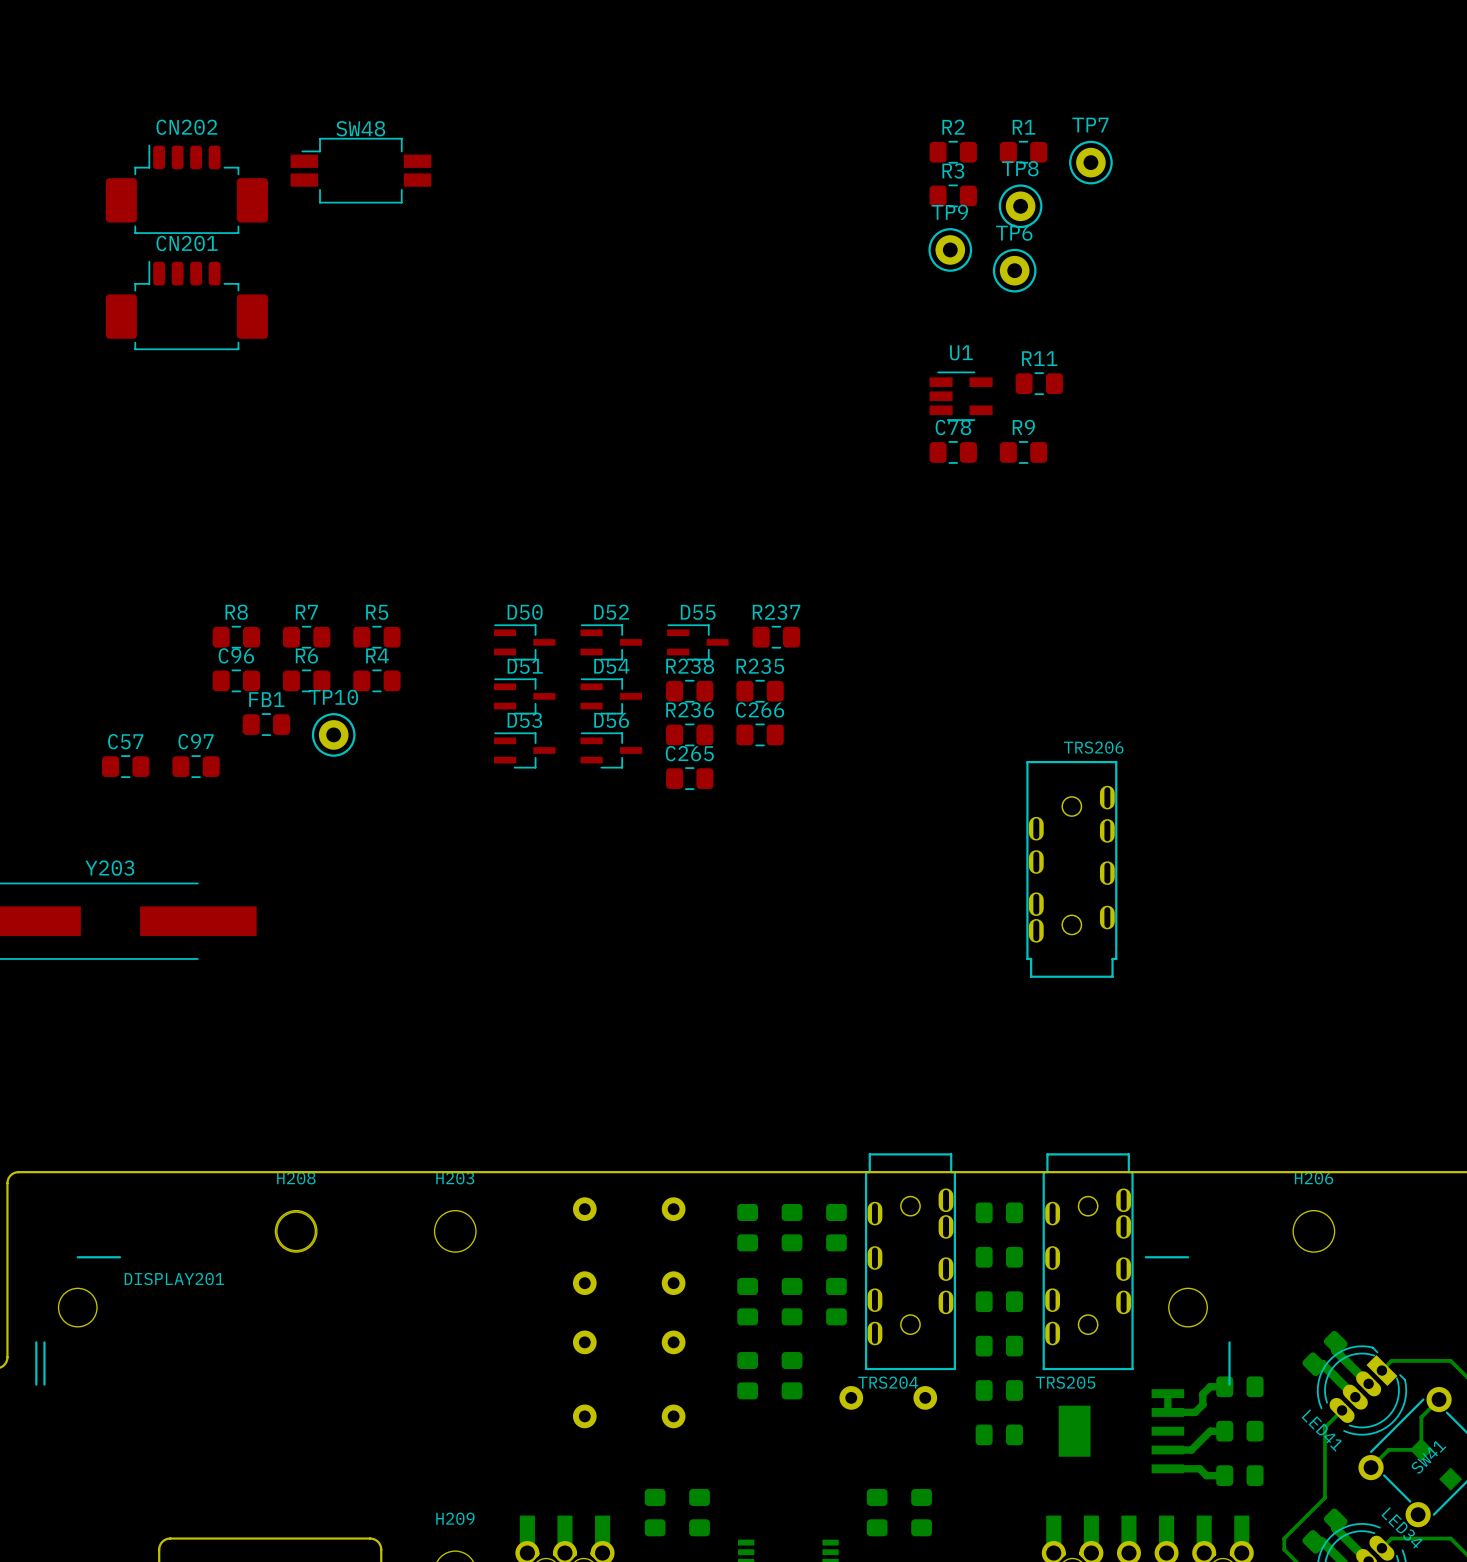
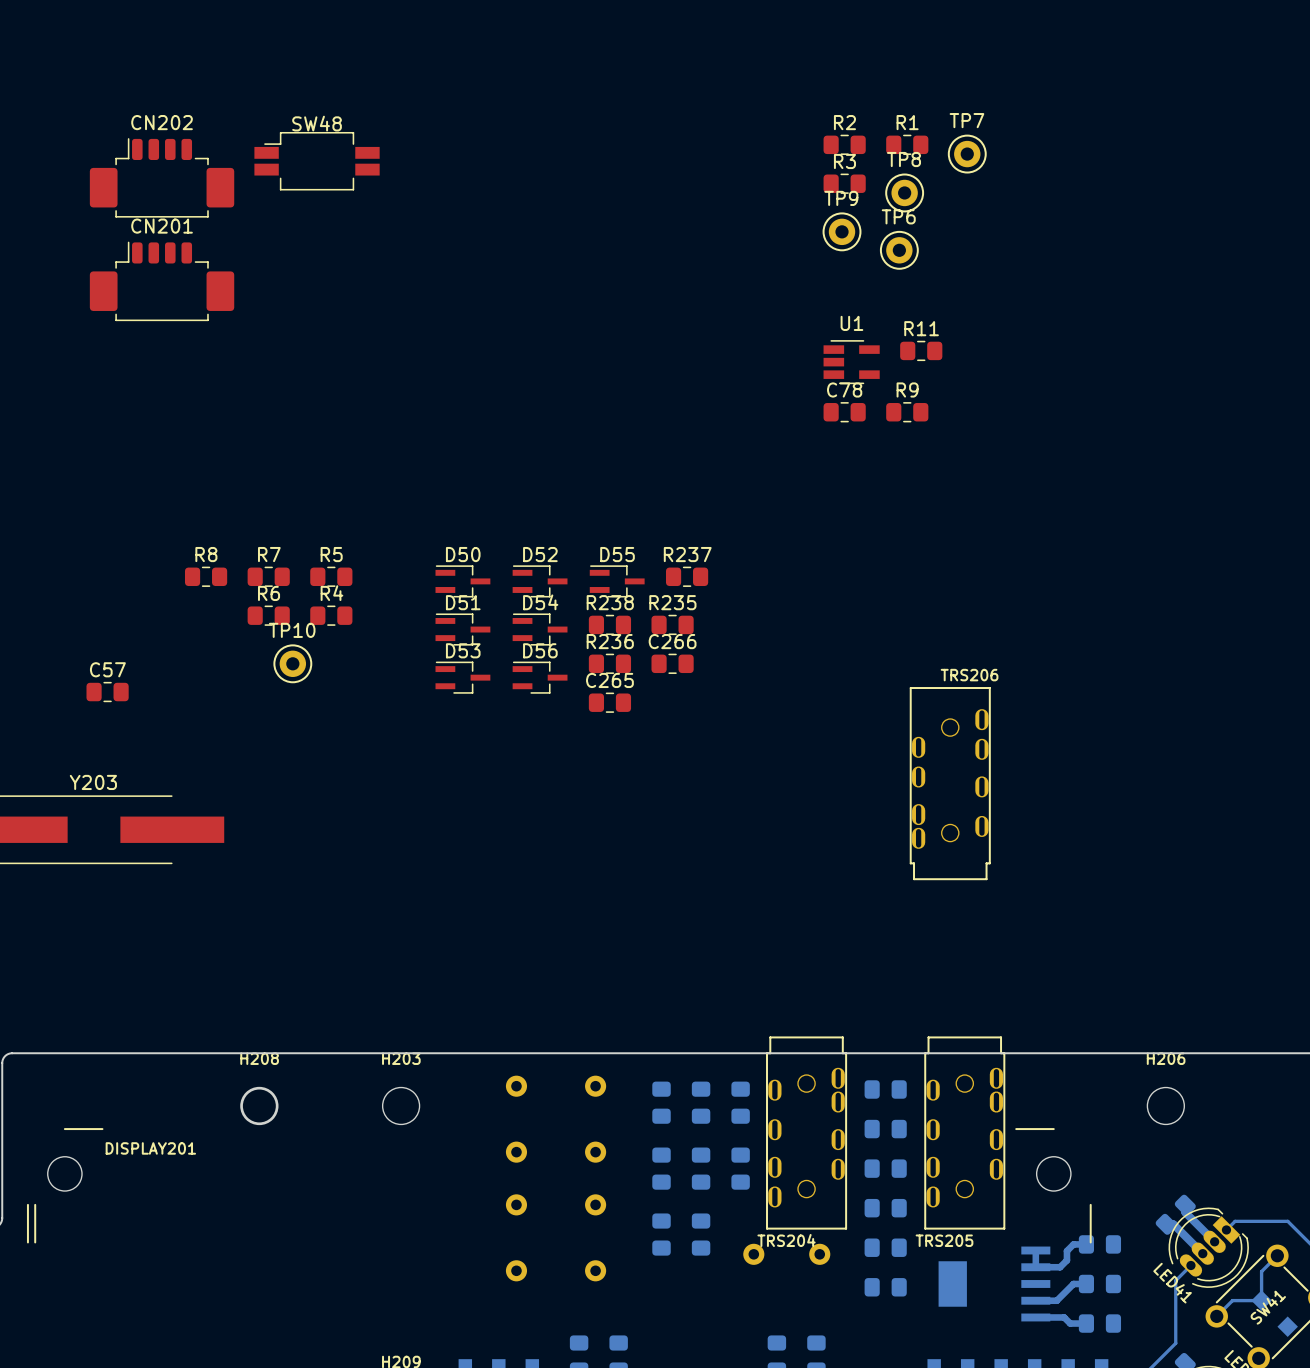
C96: (236, 680) -> none
FB1: (266, 724) -> none
C97: (196, 766) -> none

